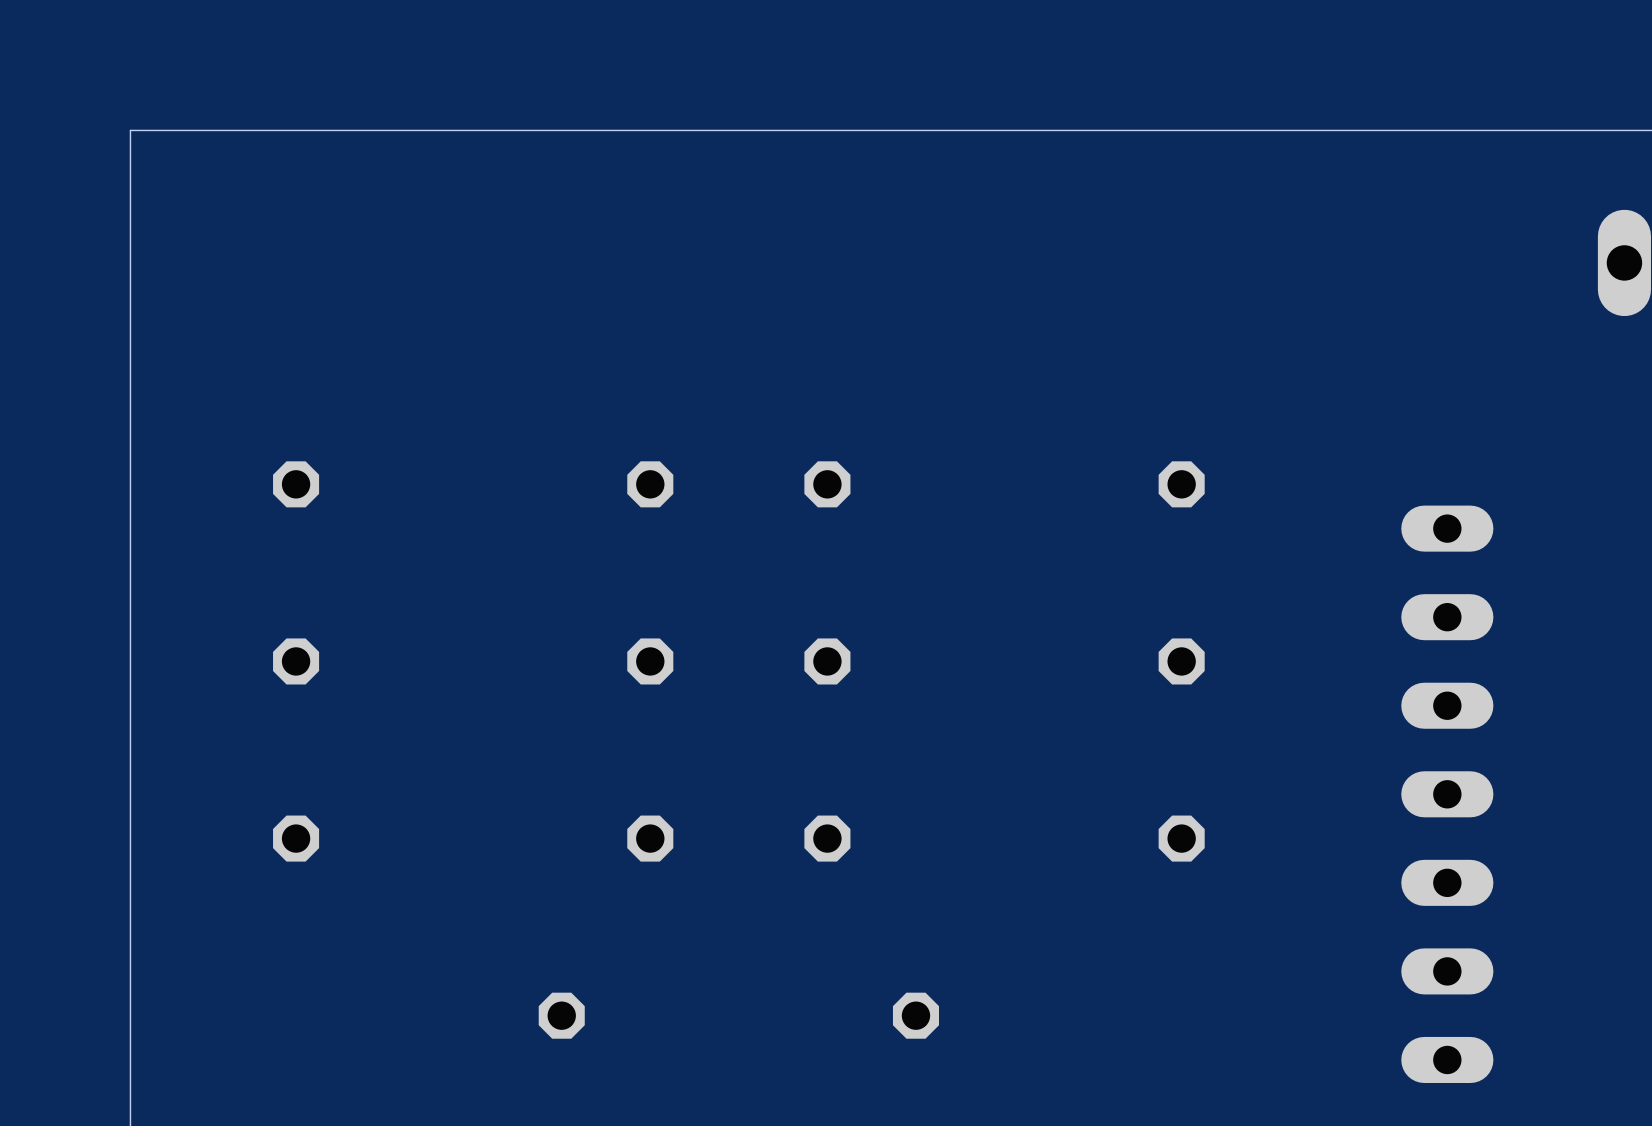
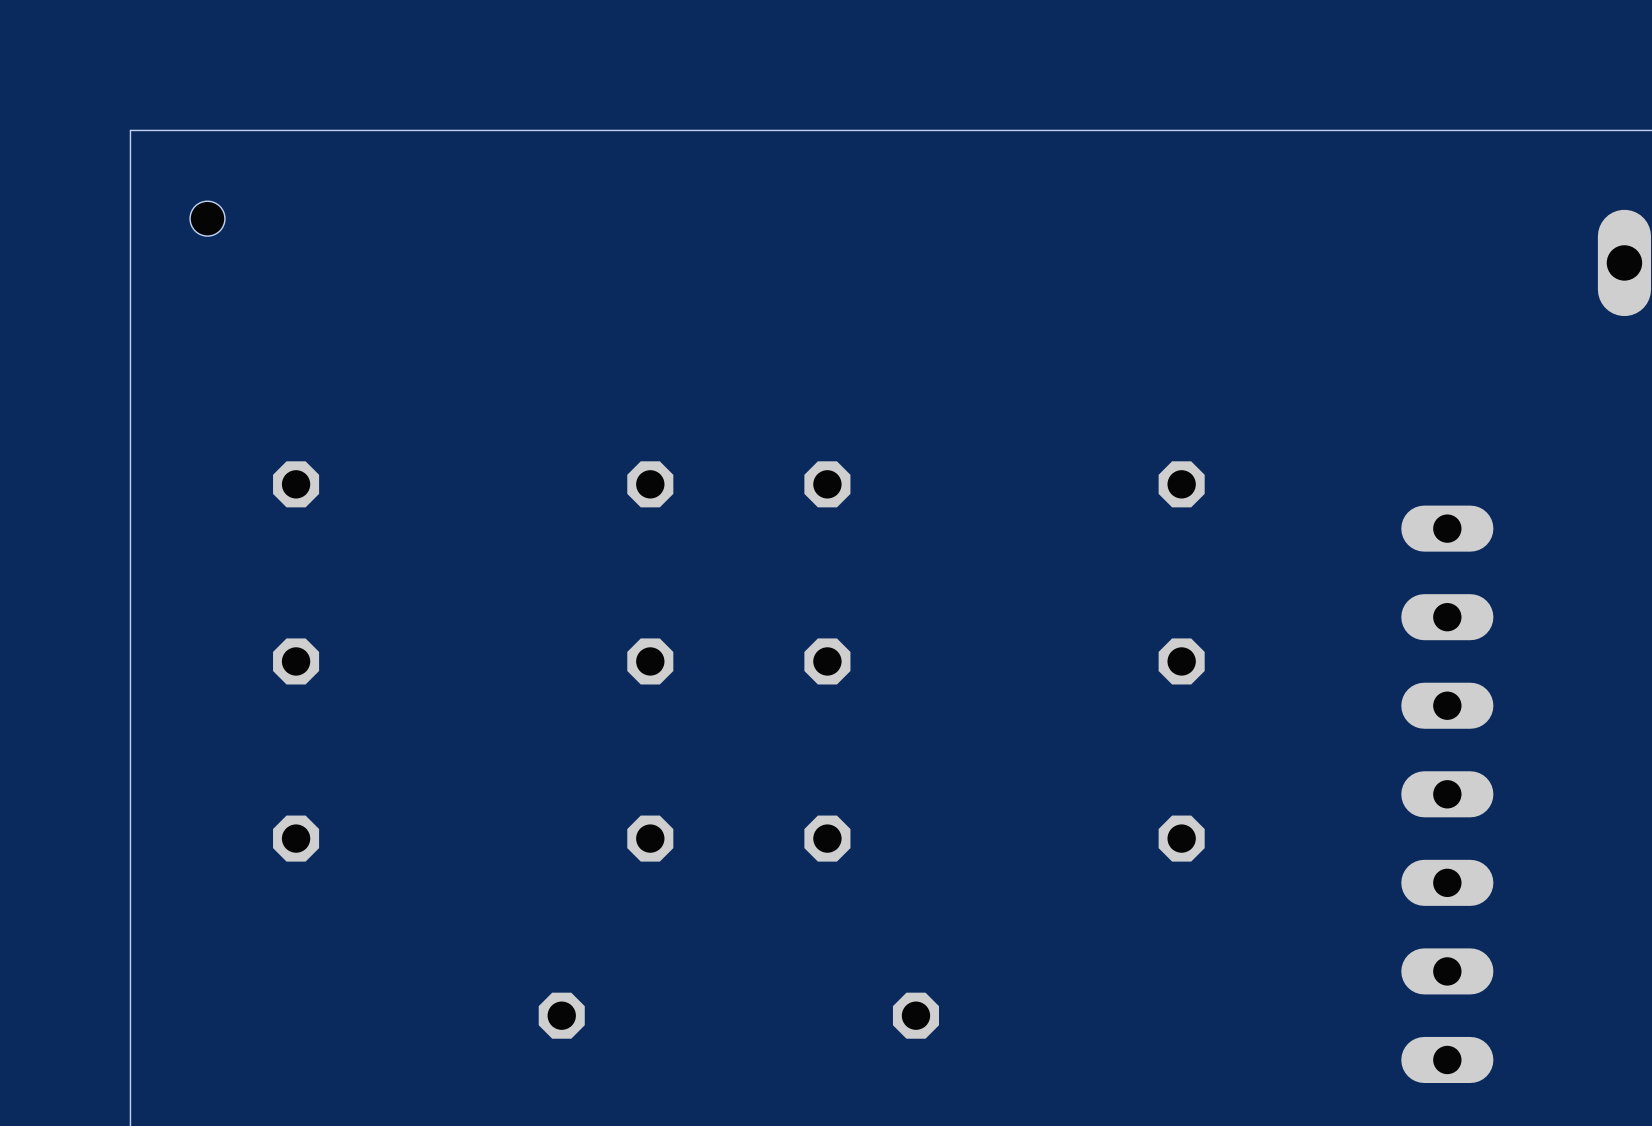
hole: none -> (207, 218)

